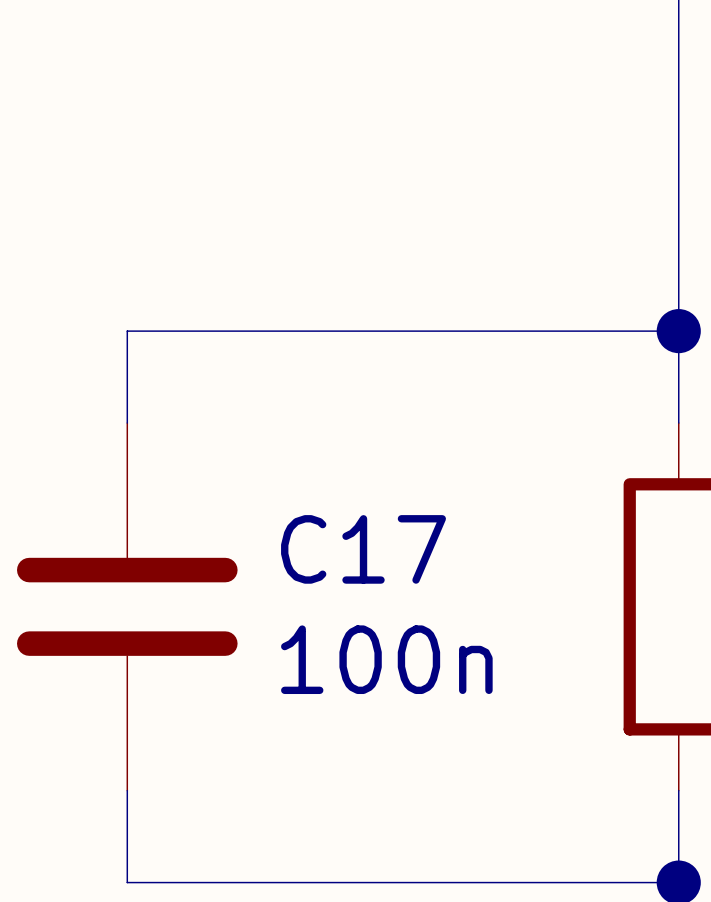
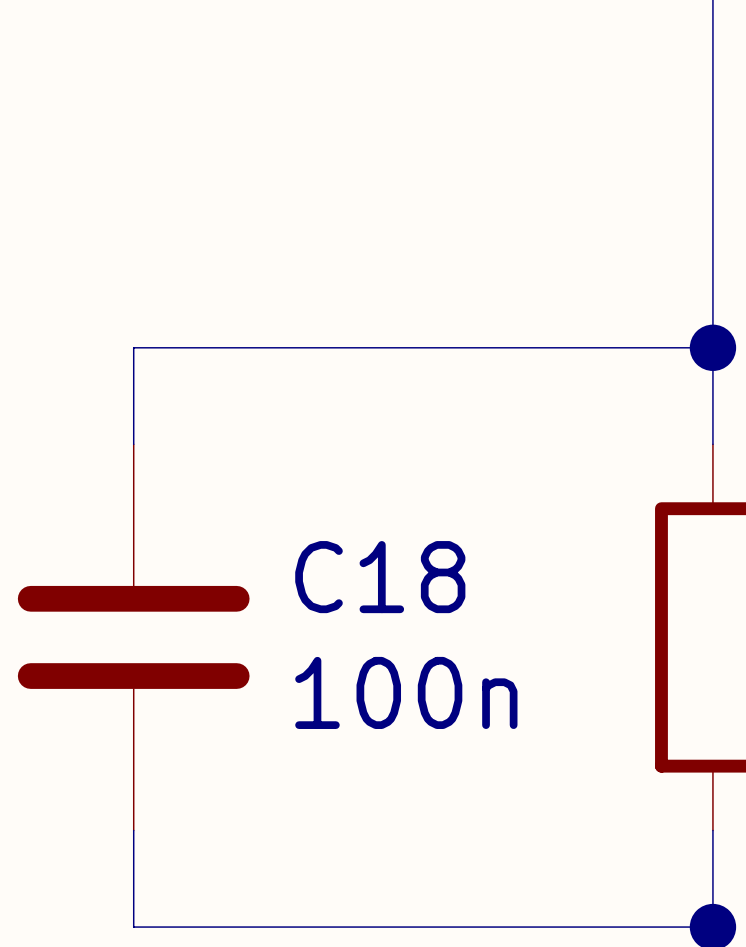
C17 name: C17 (363, 549) -> C18 (380, 577)

